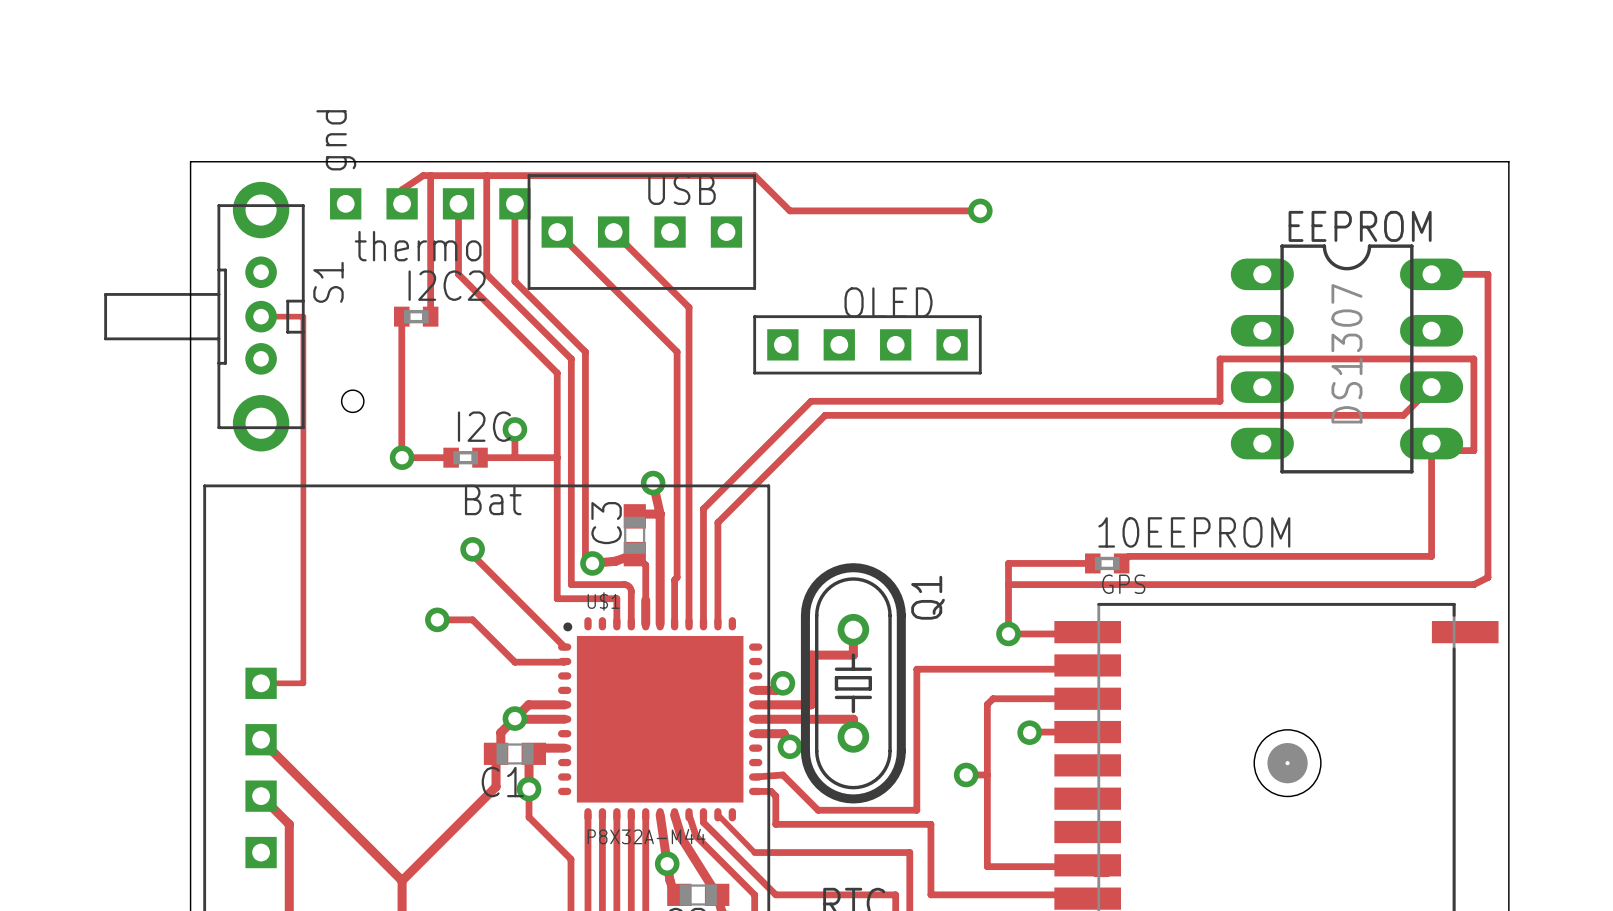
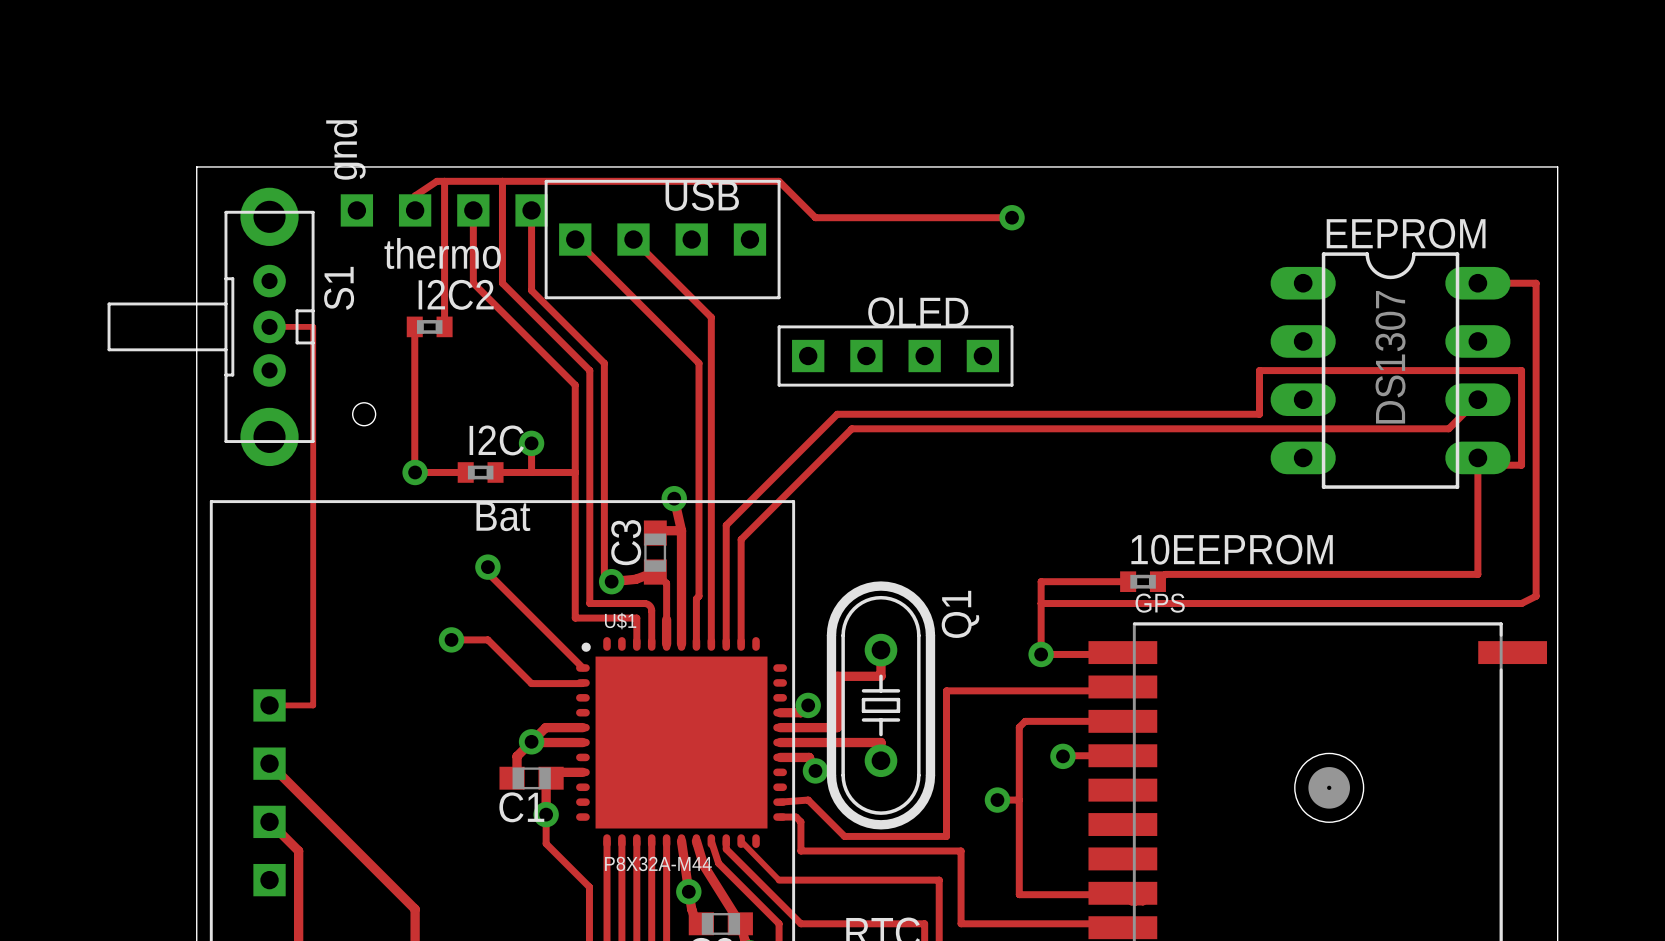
track: (496, 753) (496, 786) (402, 880) -> none

